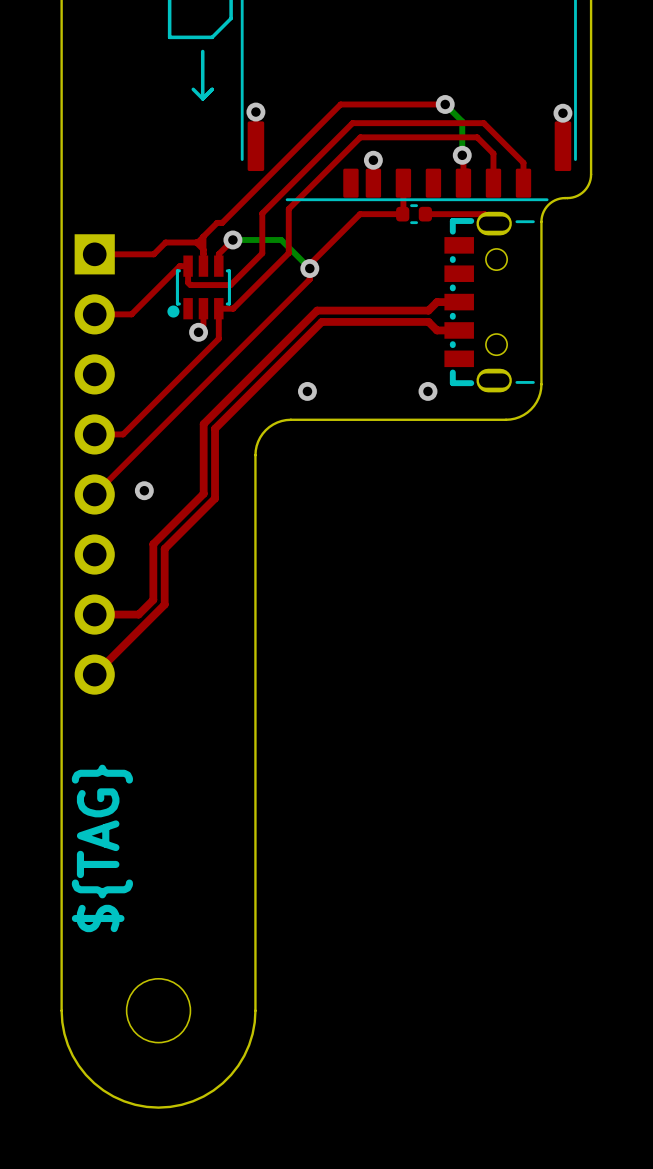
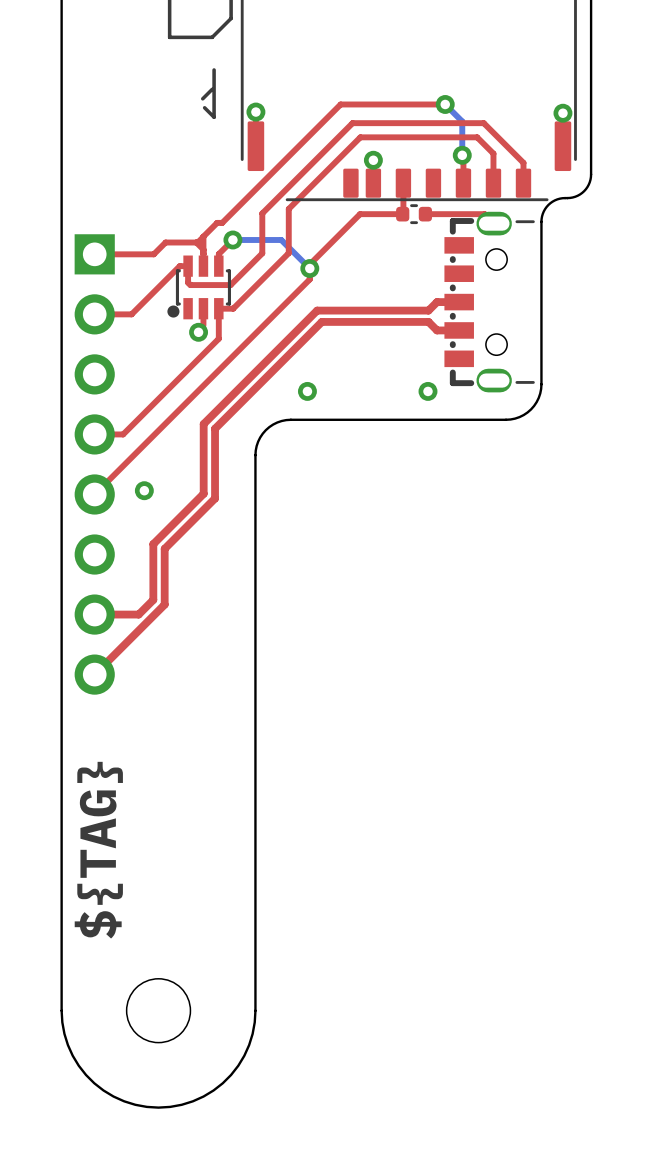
line: (202, 51) (202, 98) (193, 89) -> (214, 69) (214, 117) (204, 107)

